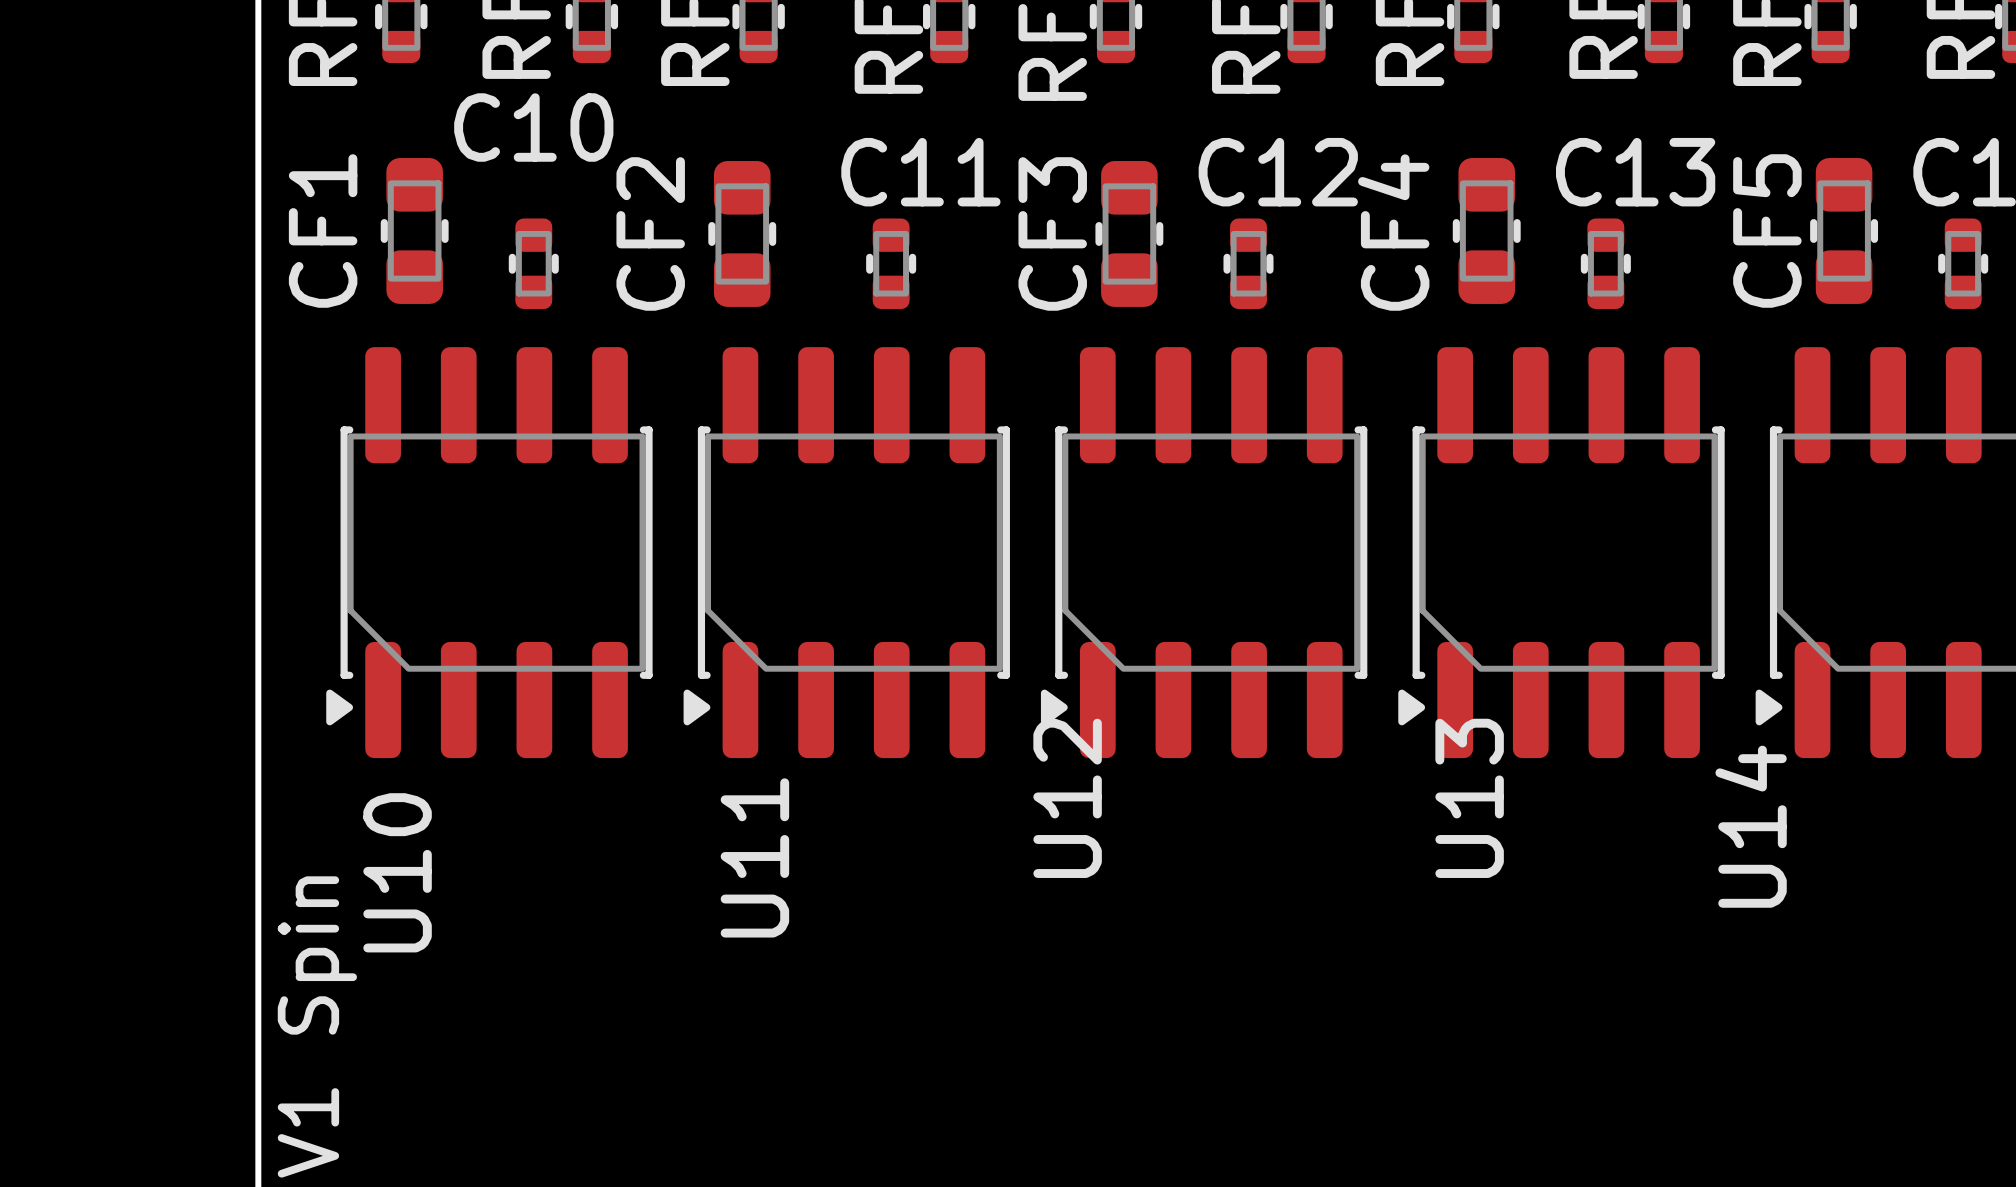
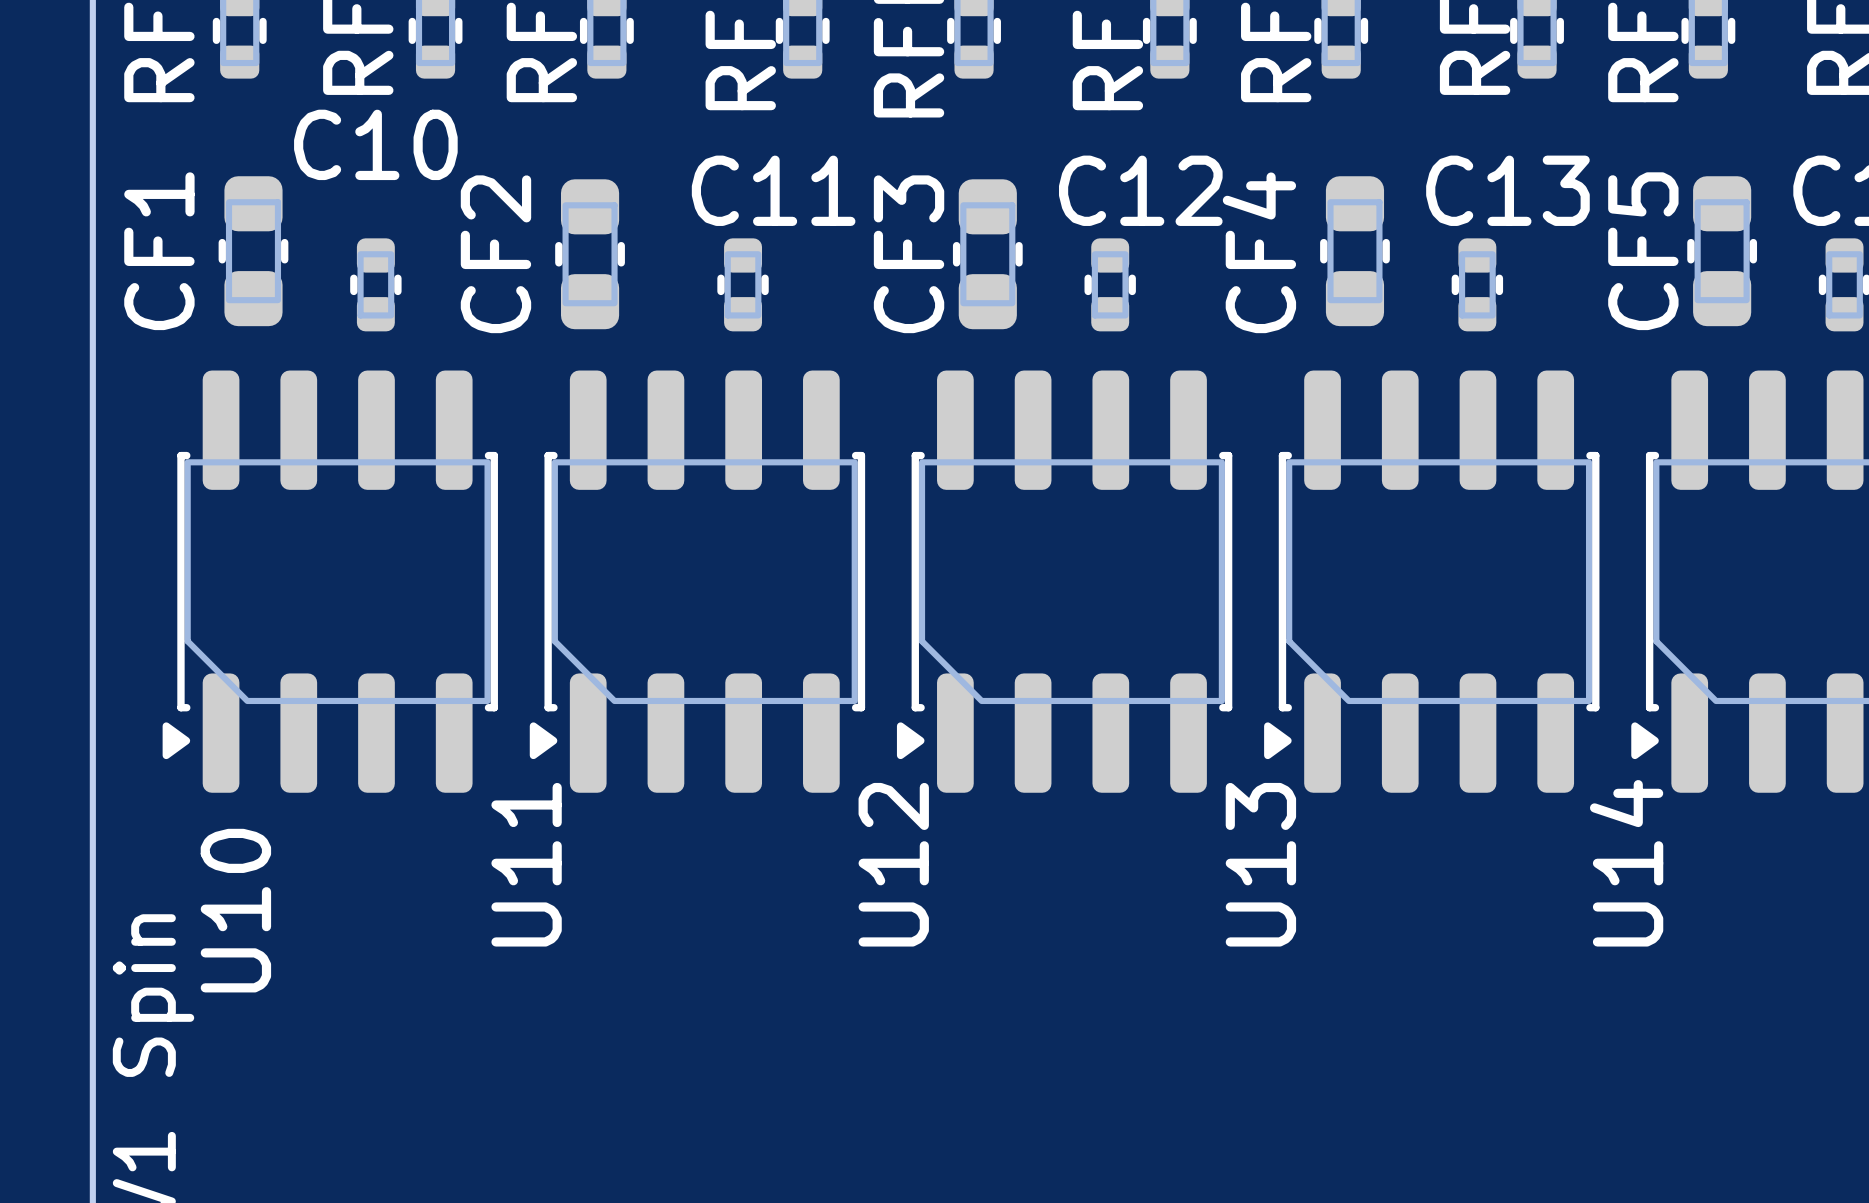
U12 name position: U12 (1067, 798) -> U12 (893, 864)
U13 name position: U13 (1469, 798) -> U13 (1260, 864)
U11 name position: U11 (754, 857) -> U11 (526, 864)

